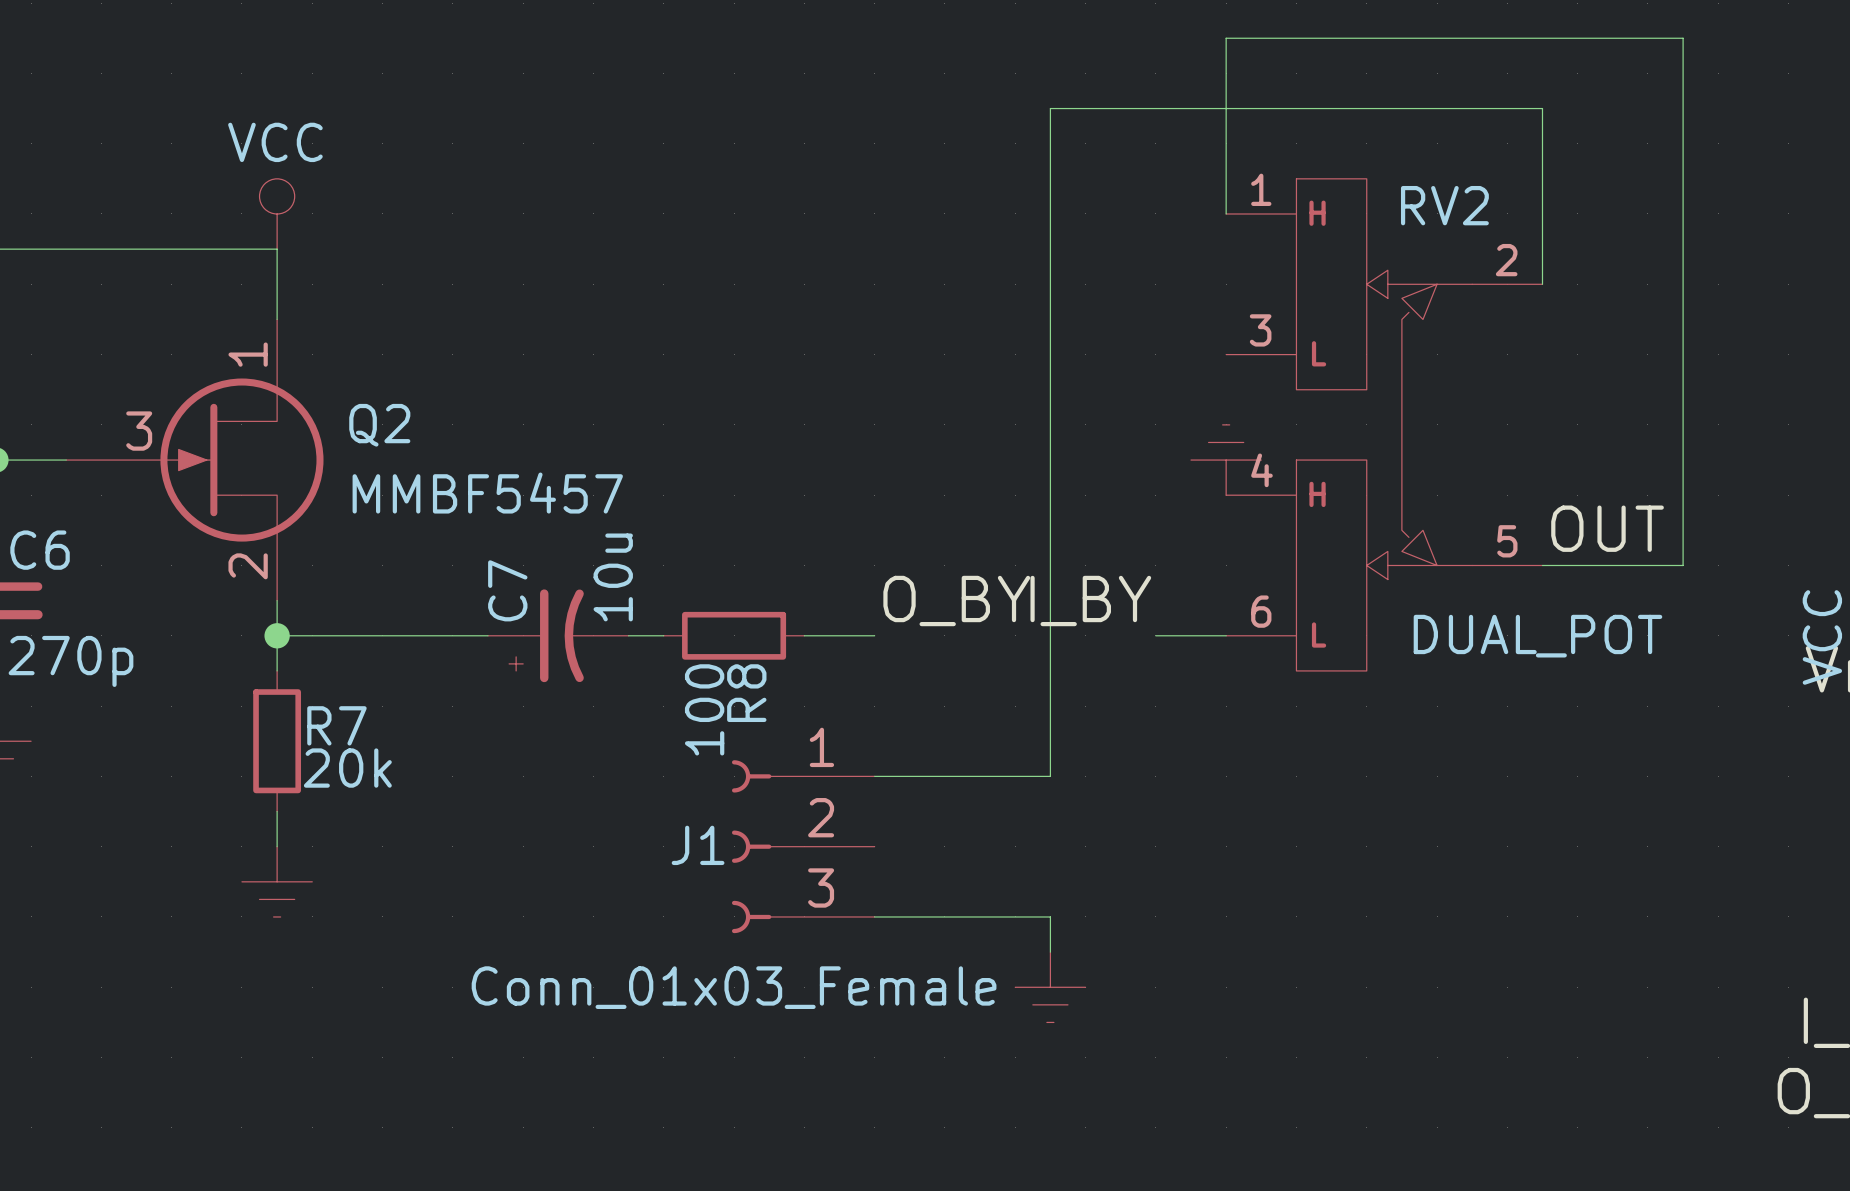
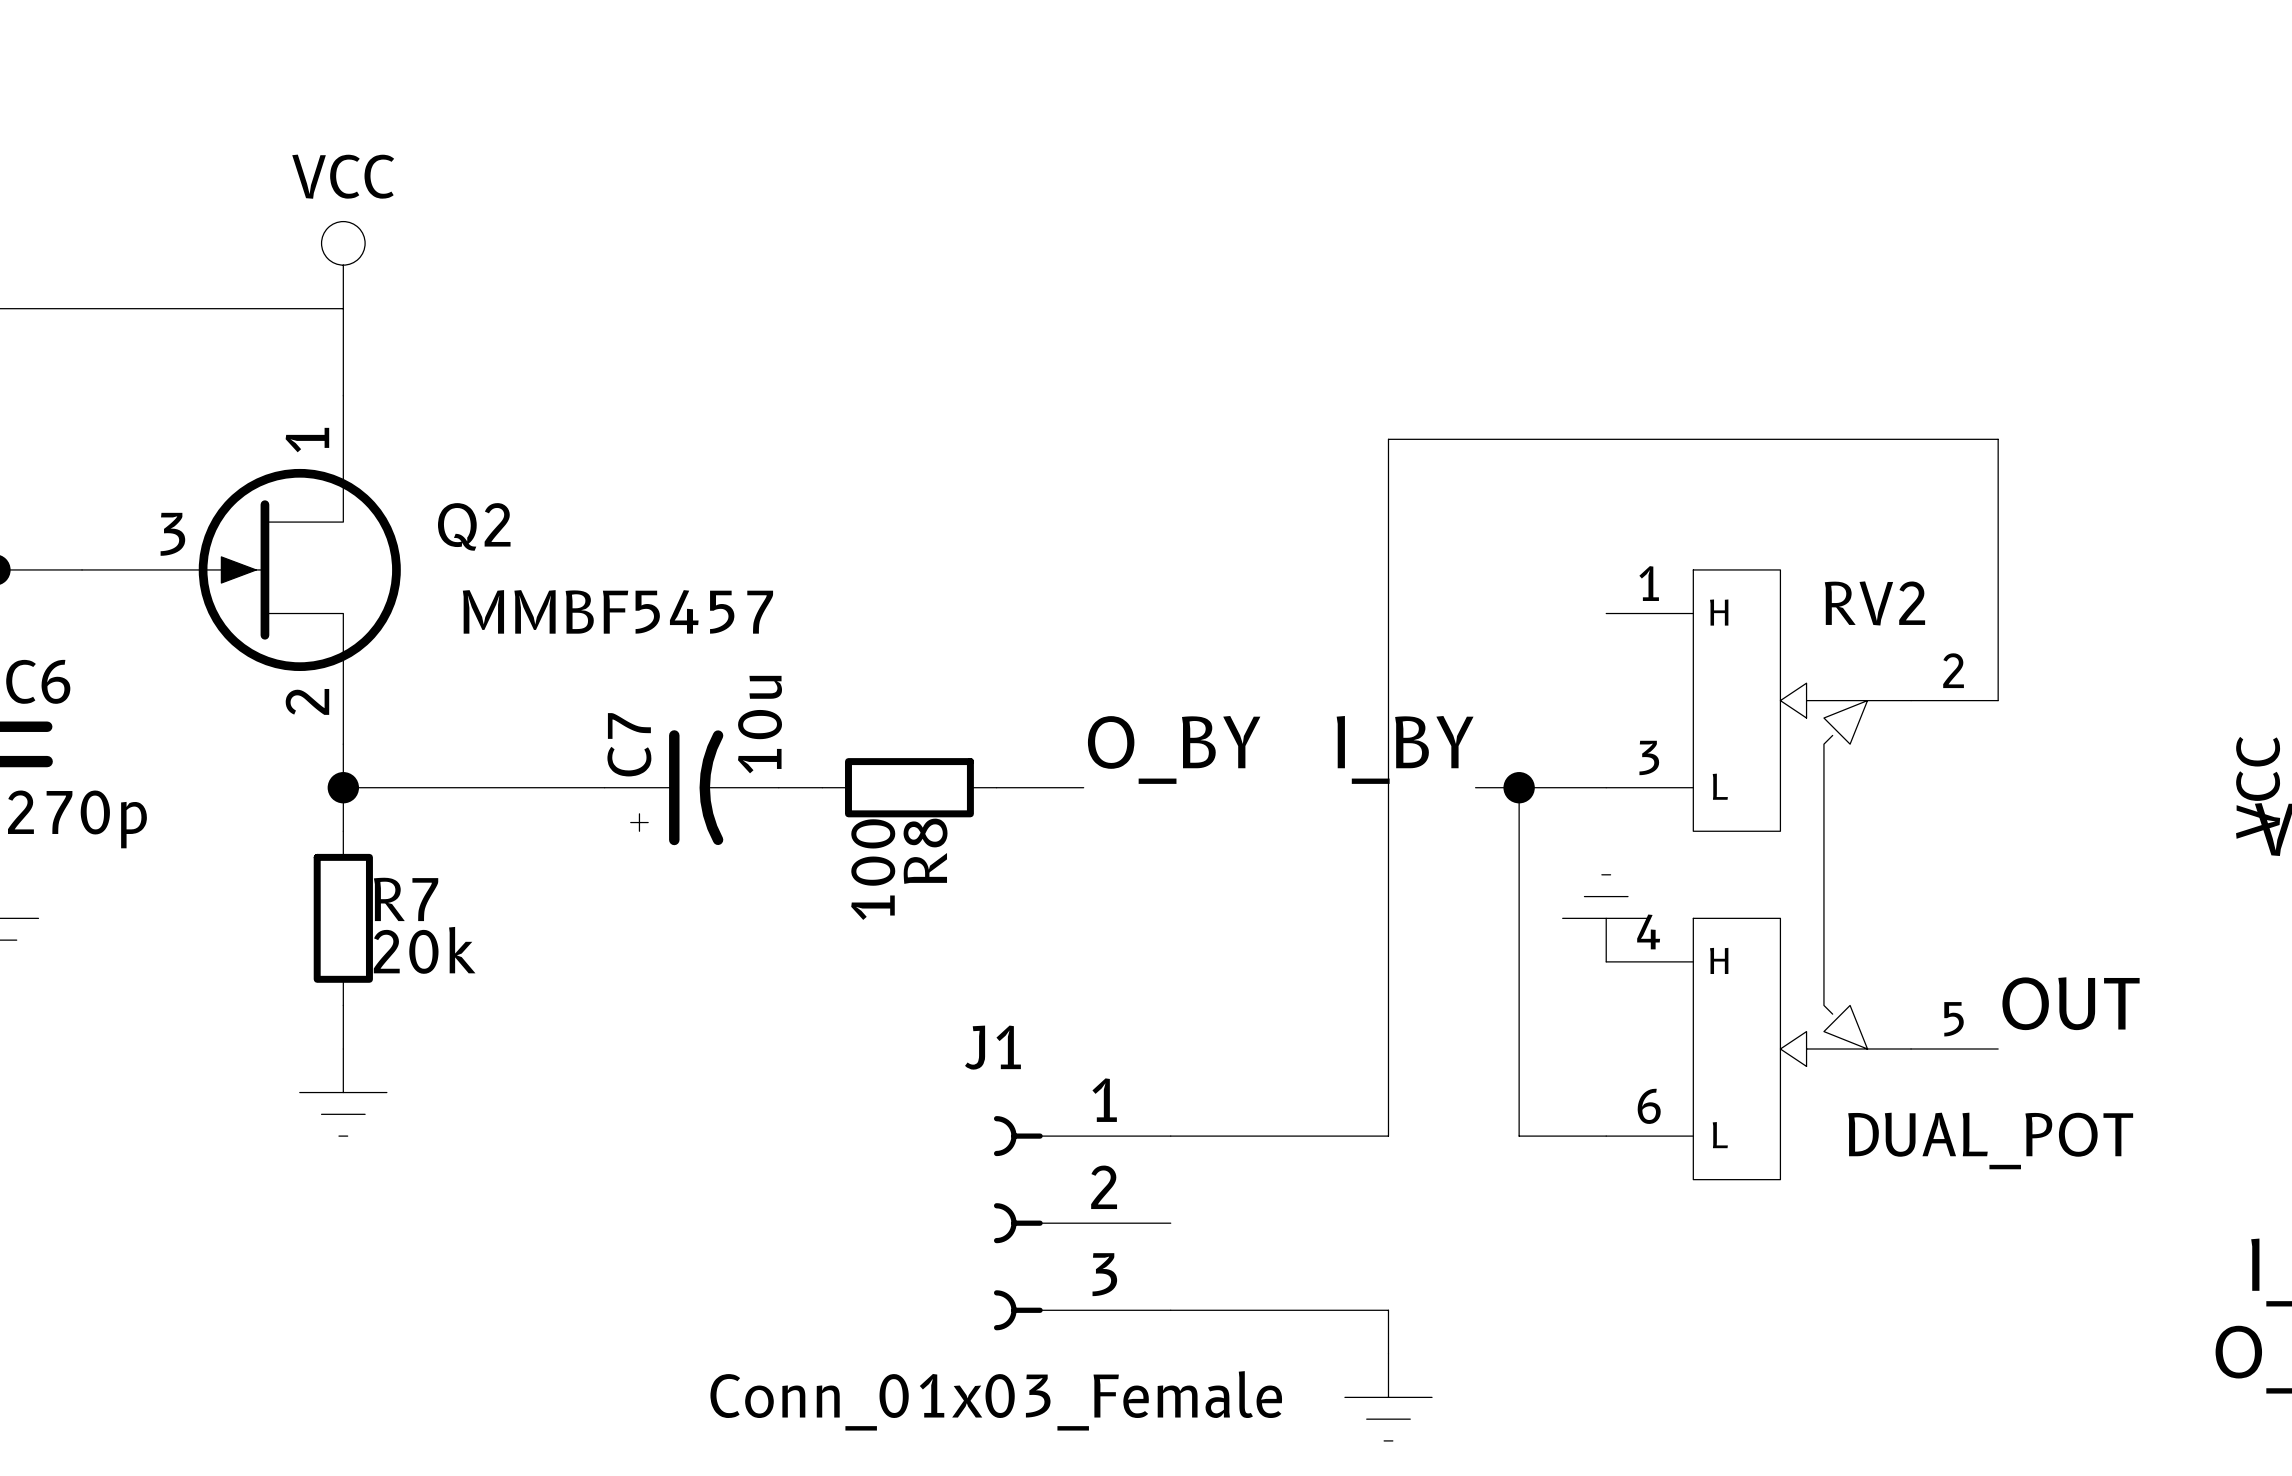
wire: (1226, 213) (1226, 38) (1683, 38) (1683, 565) (1542, 565) -> none
wire: (1542, 284) (1542, 108) (1050, 108) (1050, 776) (874, 776) -> none
RV2 position: (1384, 424) -> (1802, 874)
power symbol: (1226, 460) -> none
label position: OUT (1607, 528) -> OUT (2071, 1003)
label position: I_BY (1090, 601) -> I_BY (1405, 749)
wire: (1155, 635) (1191, 635) -> none
junction: none -> (1519, 787)
wire: none -> (1606, 787) (1519, 787) (1519, 1136) (1606, 1136)
power symbol: none -> (1606, 918)
J1 name position: J1 (698, 845) -> J1 (992, 1047)
J1 position: (803, 846) -> (1082, 1223)
wire: (1050, 916) (1050, 952) -> (1301, 1136) (1388, 1136) (1388, 439) (1998, 439) (1998, 700)
power symbol position: (1050, 987) -> (1388, 1397)
wire: none -> (1170, 1310) (1388, 1310) (1388, 1353)

